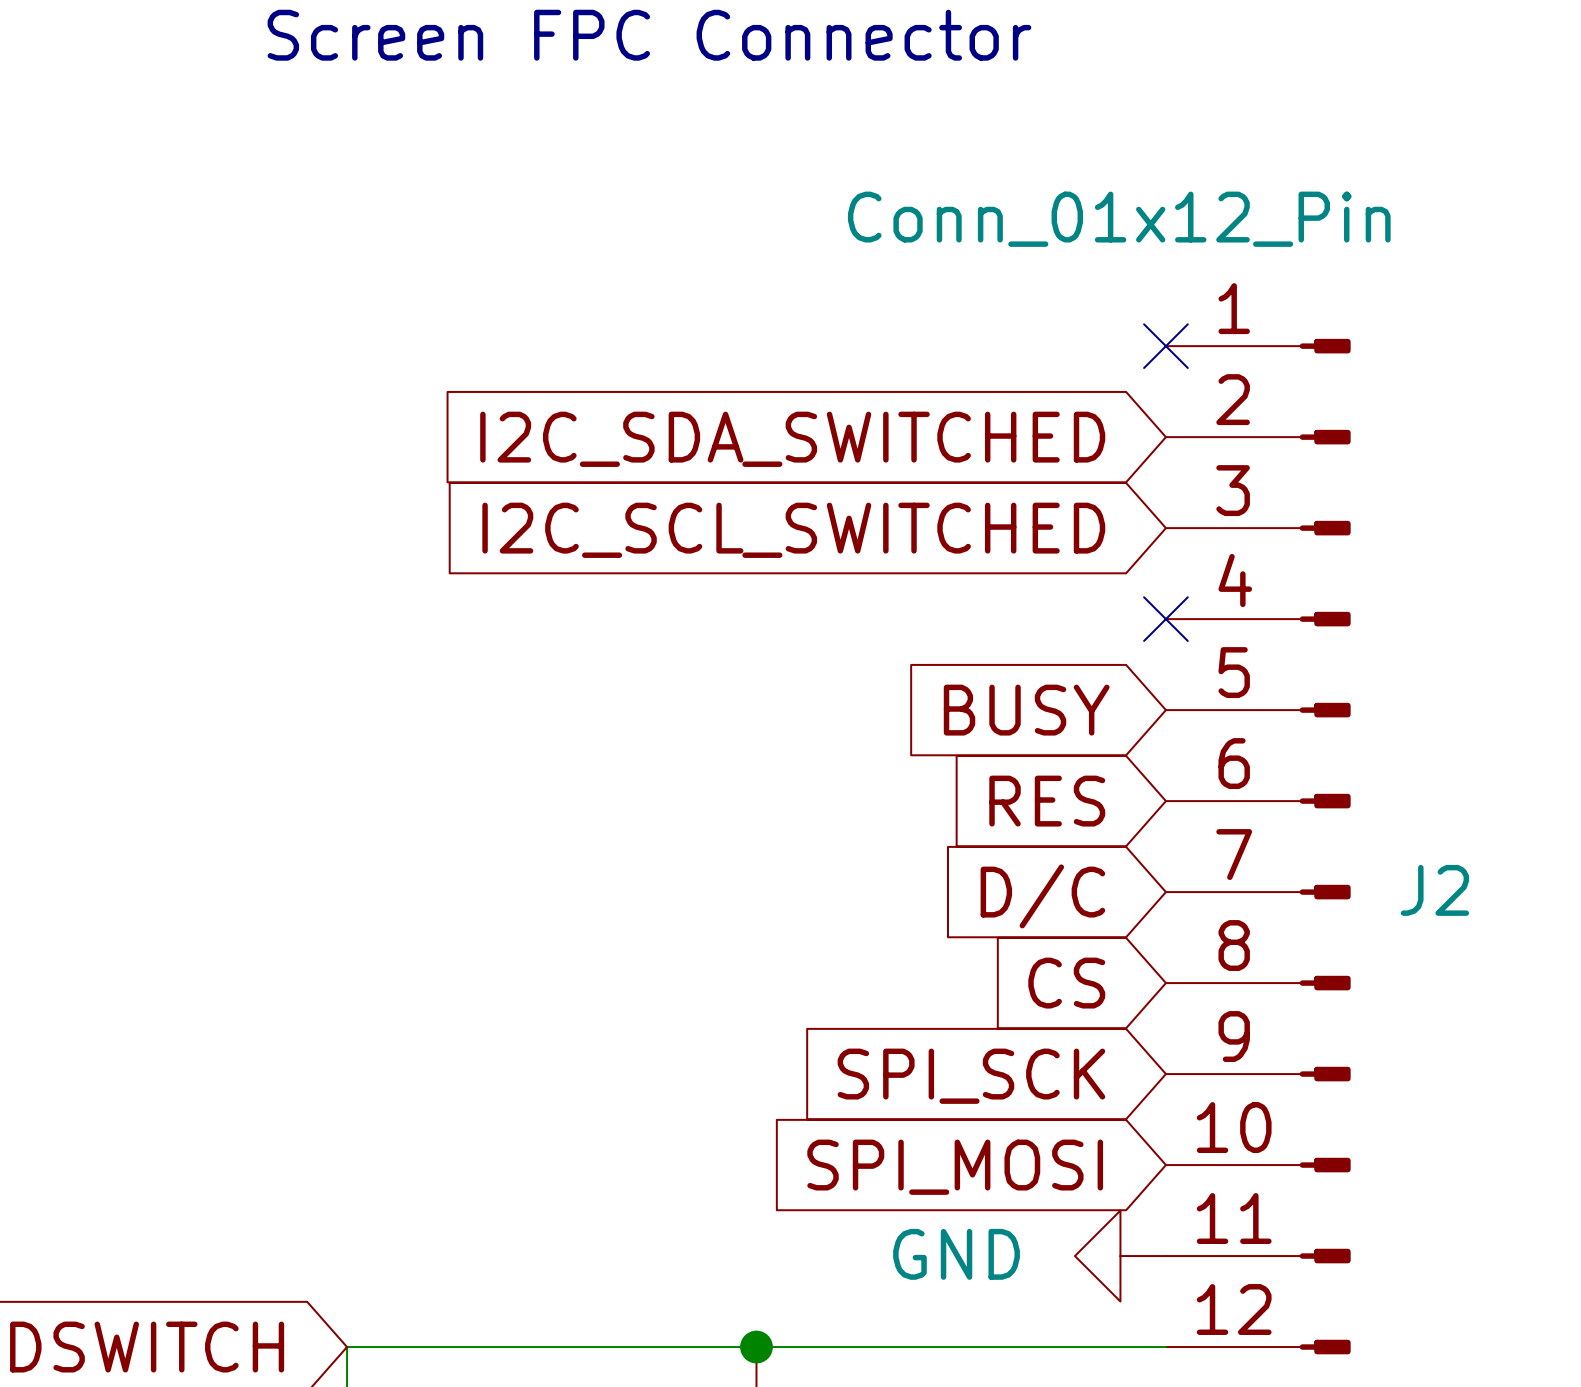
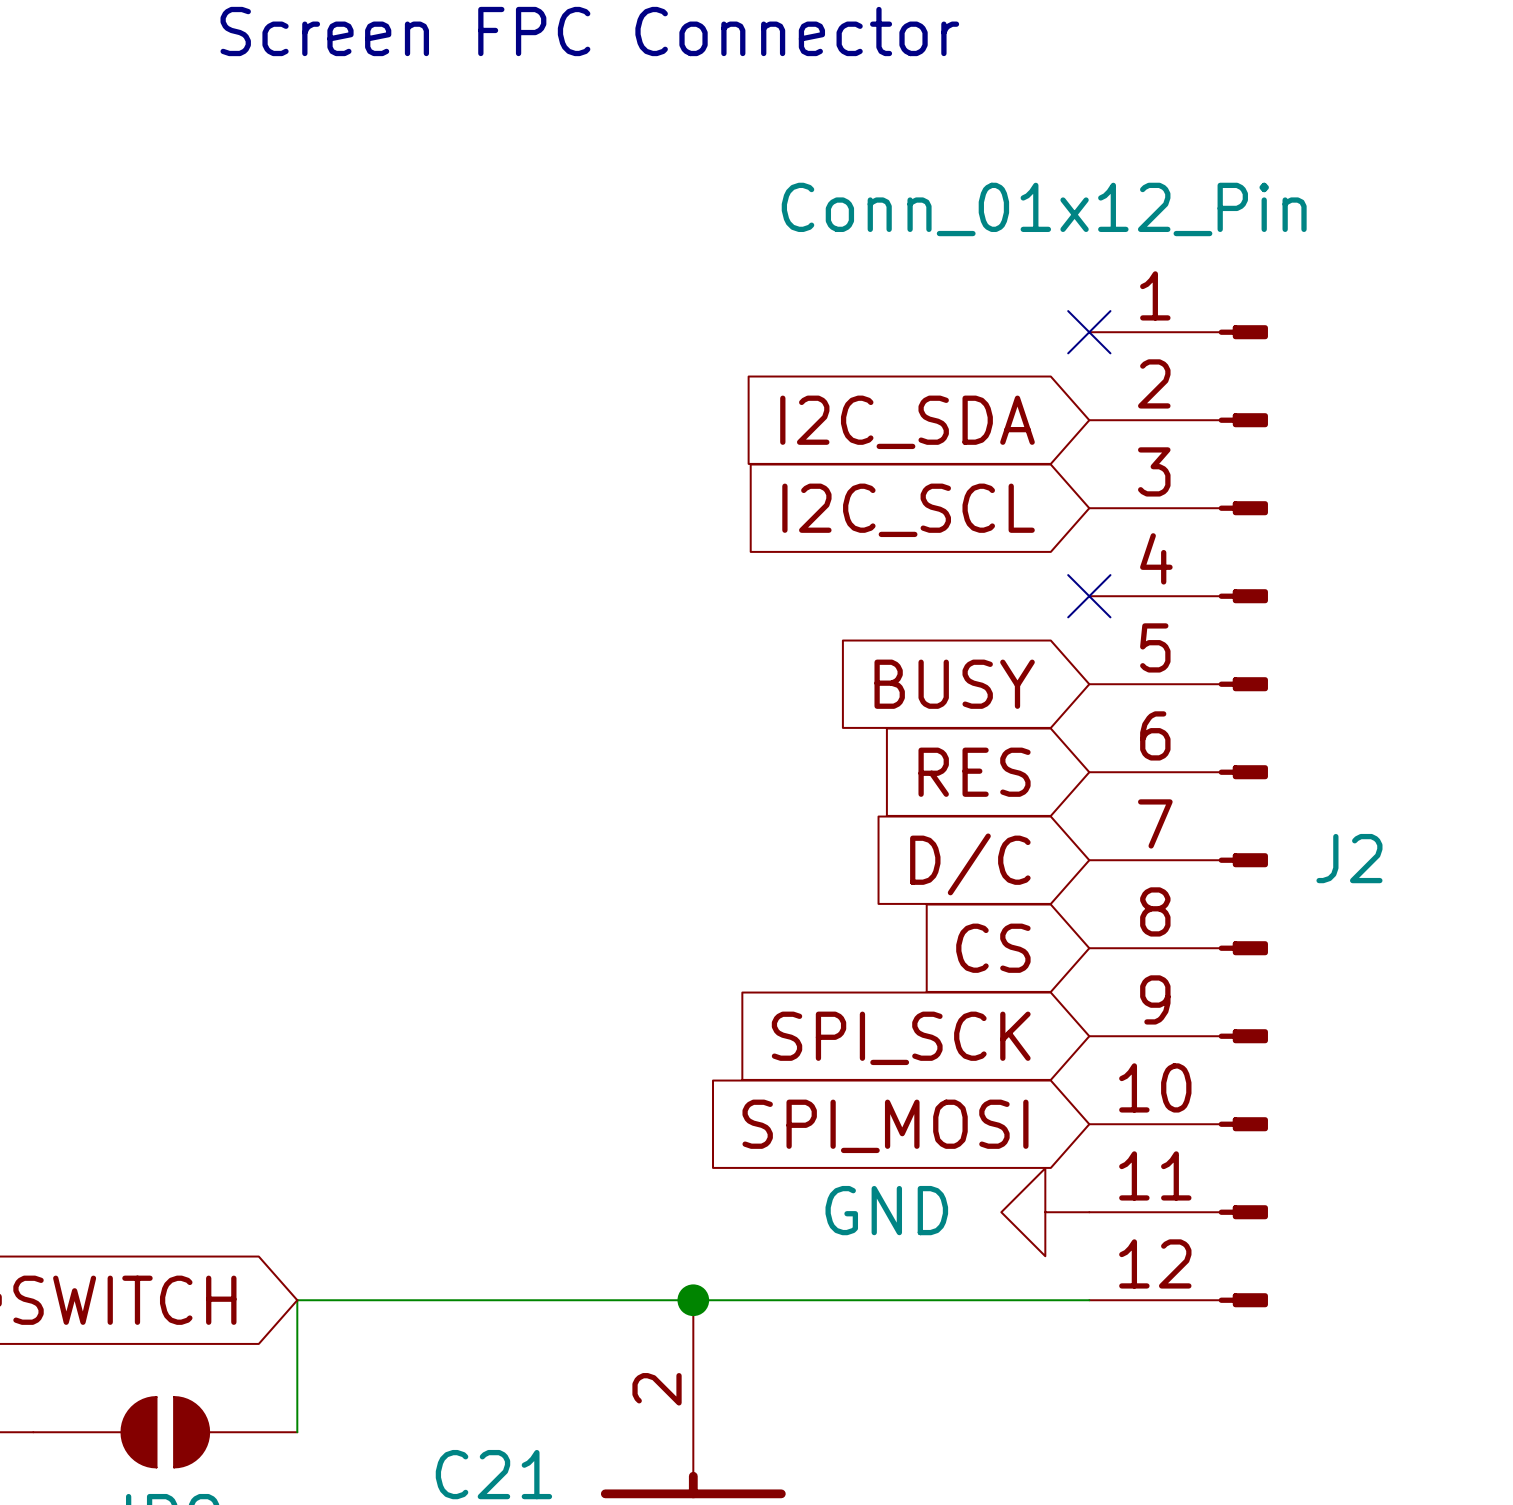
global label: I2C_SDA_SWITCHED (792, 439) -> I2C_SDA (907, 422)
global label: I2C_SCL_SWITCHED (793, 530) -> I2C_SCL (908, 510)

